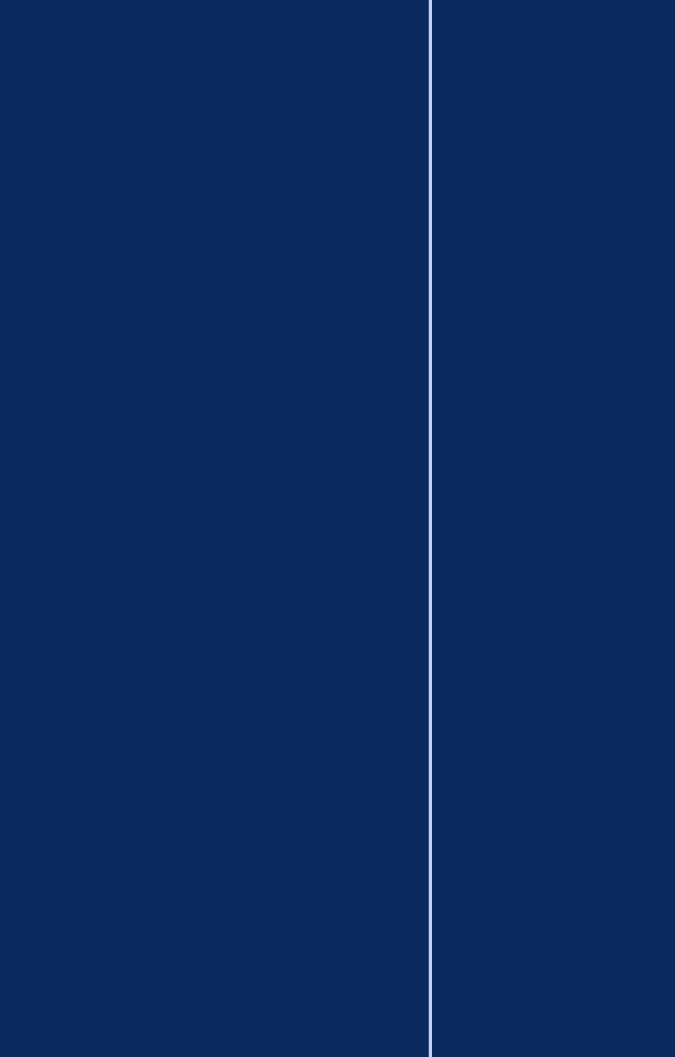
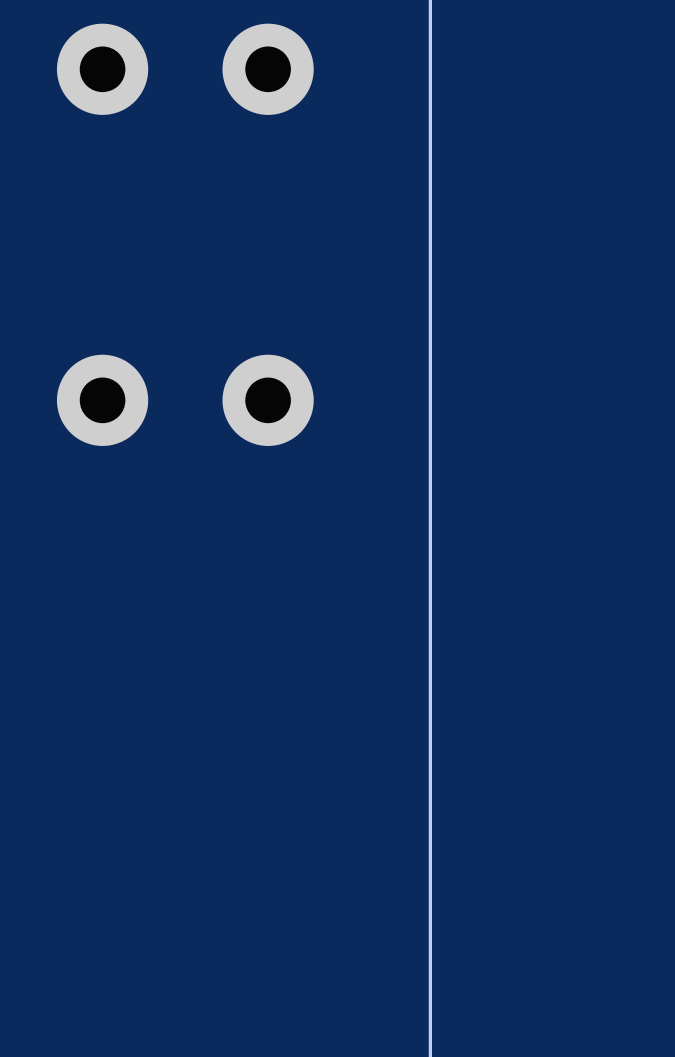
part: none -> (185, 69)
part: none -> (185, 400)

